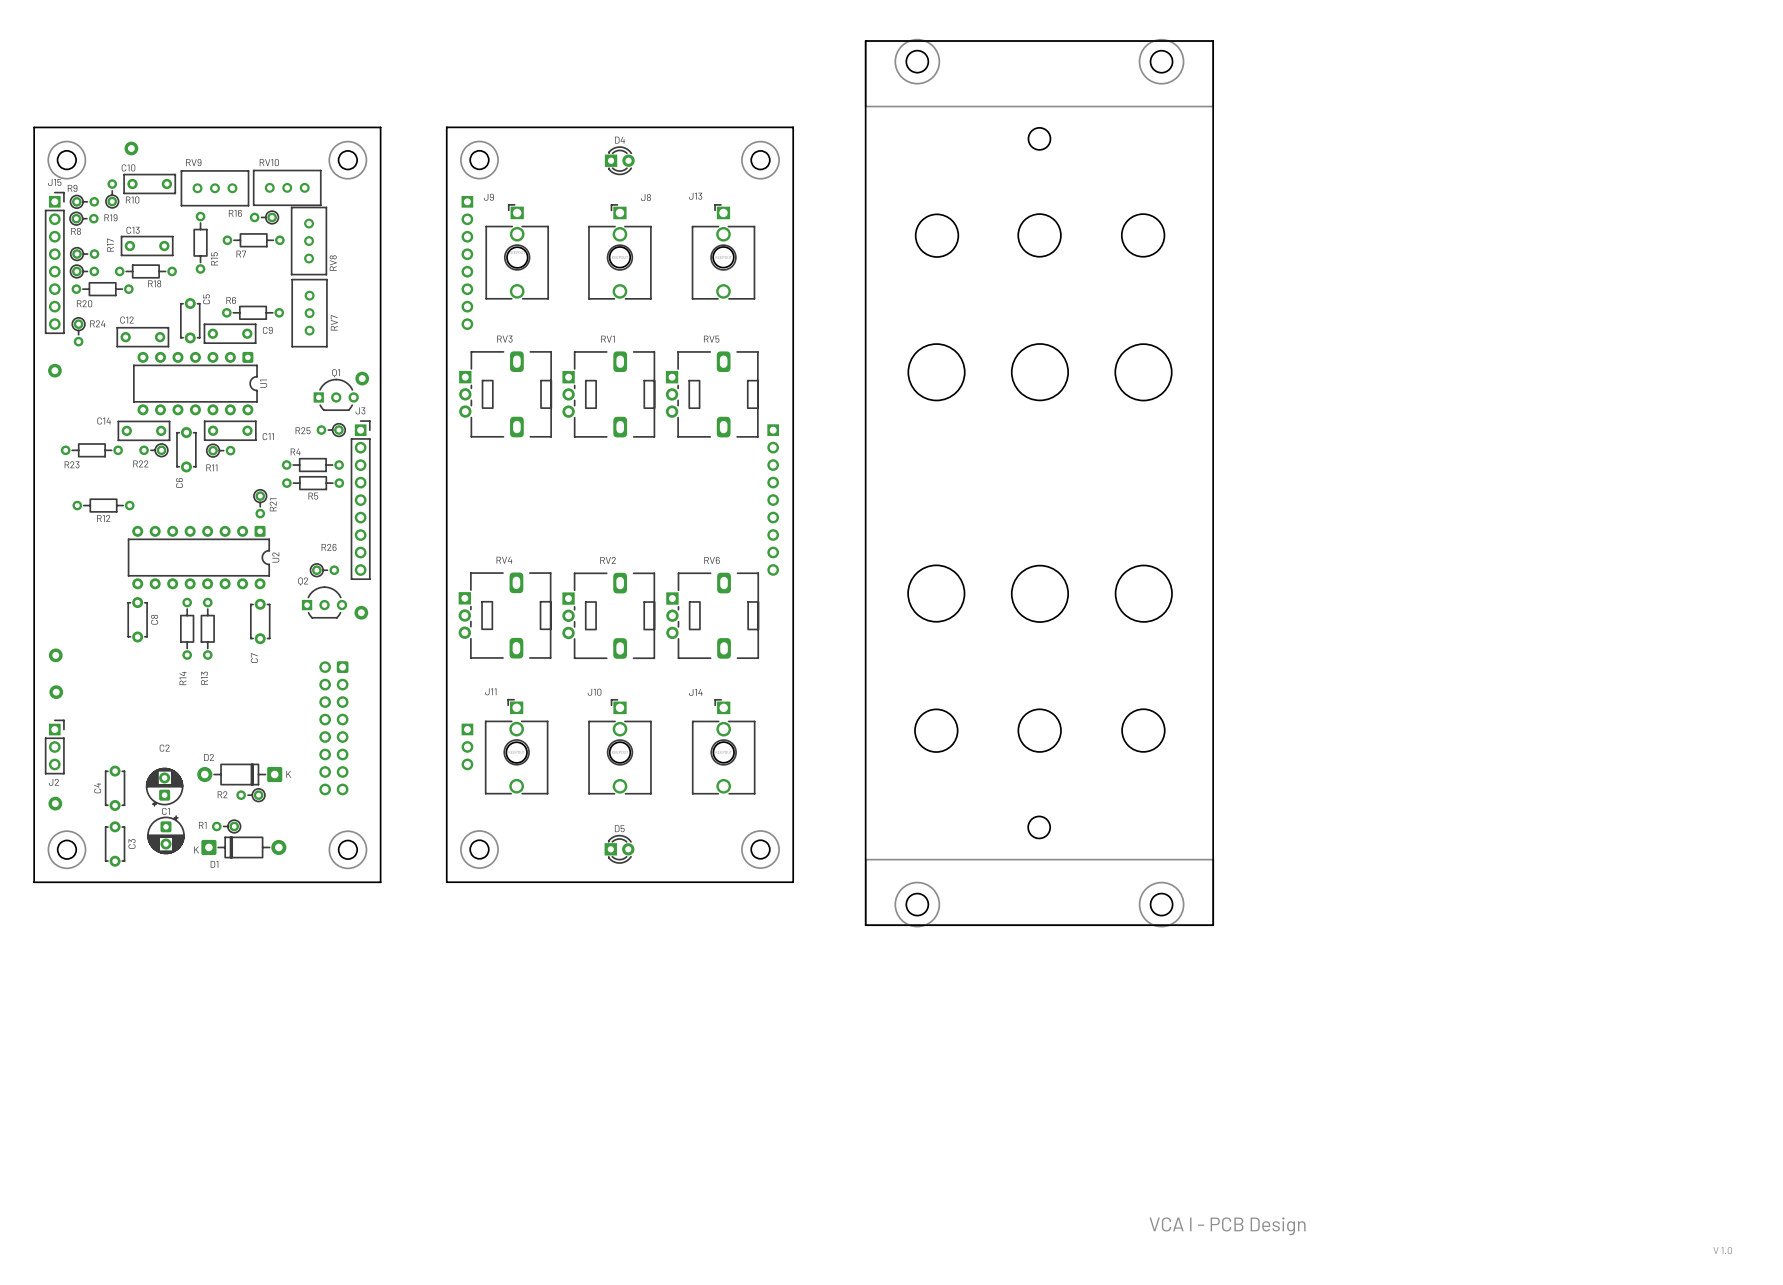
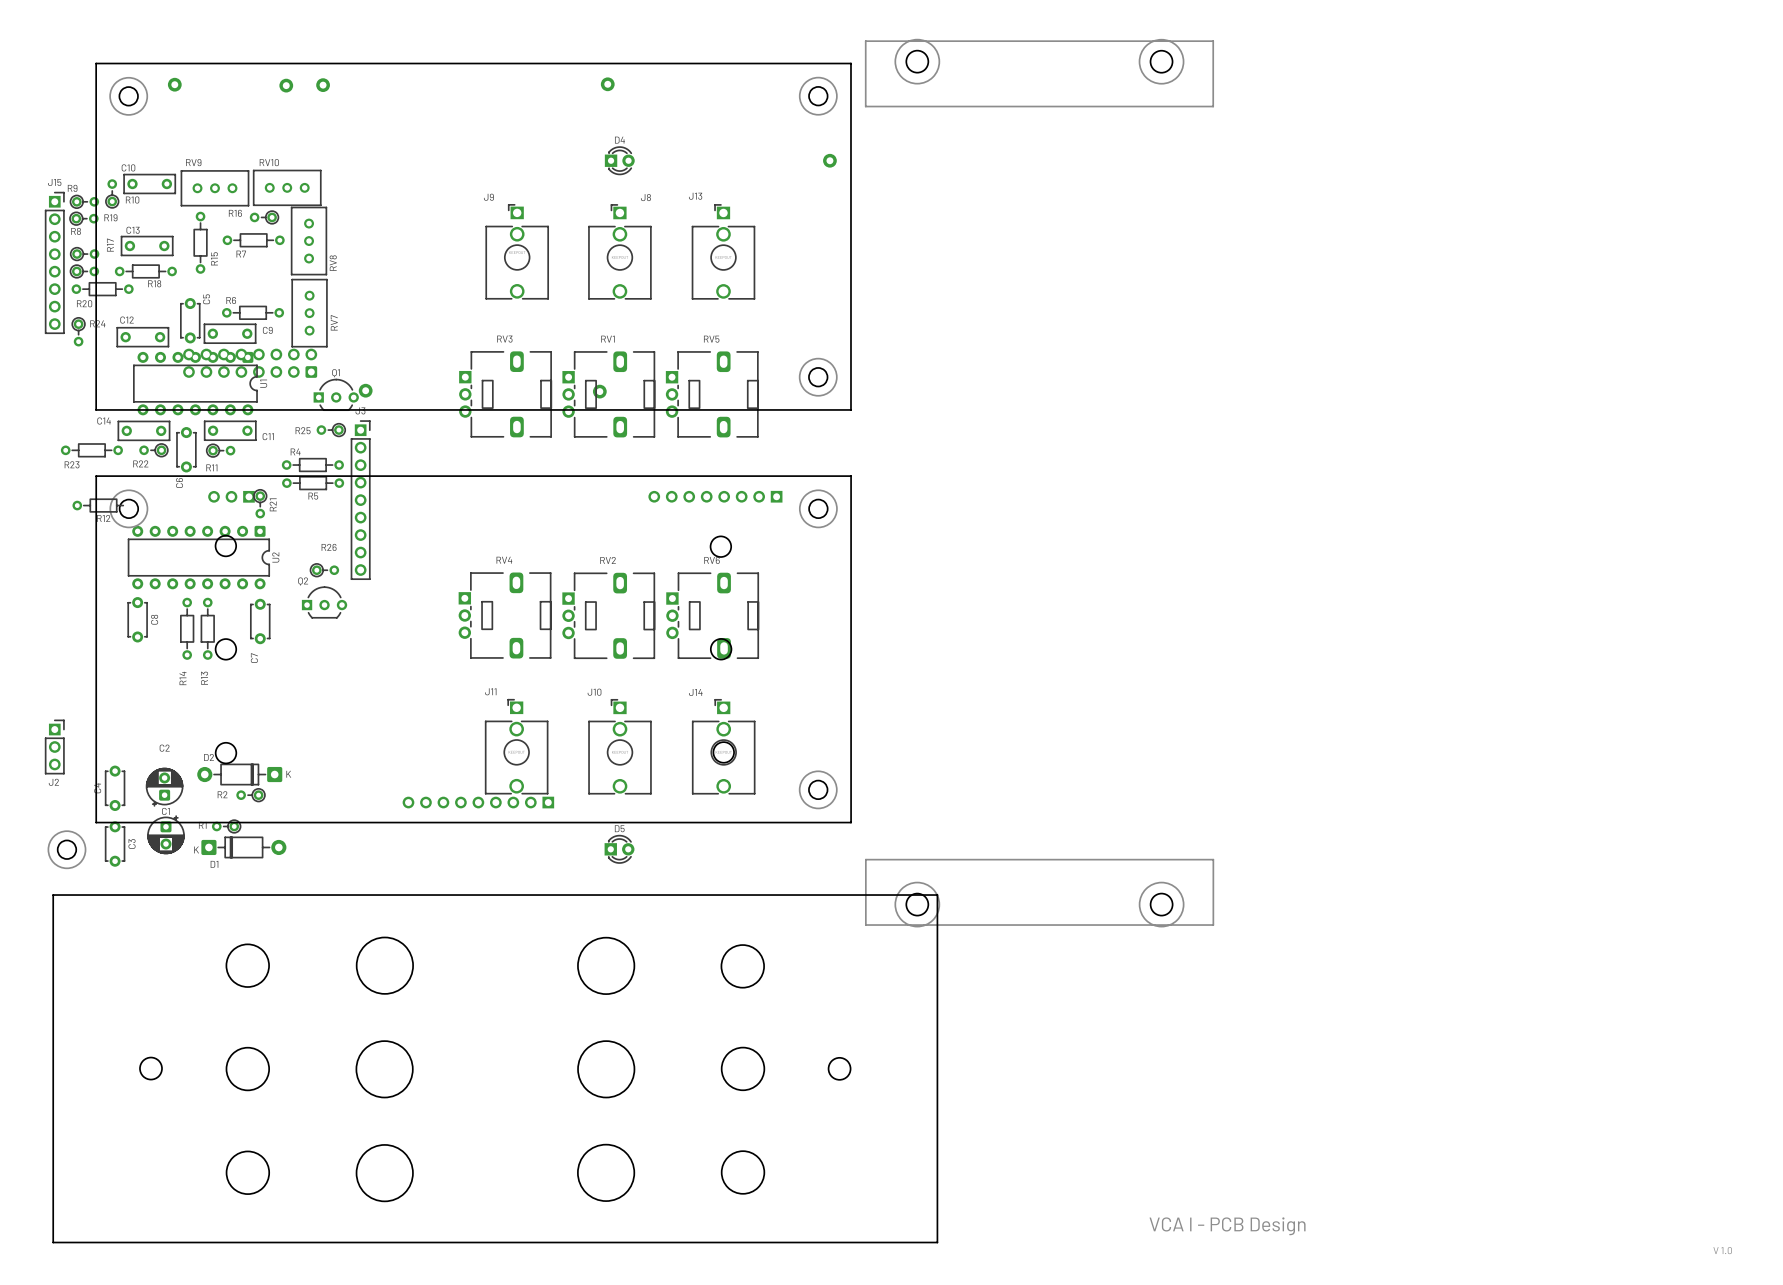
board edge: (865, 41) (1213, 41) (1213, 925) (865, 925) (865, 41) -> none
board edge: none -> (96, 63) (850, 63) (850, 409) (96, 409) (96, 63)
part: none -> (607, 84)
part: none -> (286, 85)
part: none -> (323, 85)
board edge: (34, 127) (380, 127) (380, 882) (34, 882) (34, 127) -> none
board edge: (446, 127) (793, 127) (793, 882) (446, 882) (446, 127) -> none
round board edge: [1028, 127, 1051, 151] -> none
part position: (131, 148) -> (174, 84)
part position: (66, 160) -> (128, 96)
part: (347, 160) -> none
part: (479, 160) -> none
part position: (760, 160) -> (818, 96)
part: none -> (829, 160)
round board edge: [1018, 213, 1062, 257] -> none
round board edge: [1121, 213, 1165, 257] -> none
round board edge: [915, 214, 959, 258] -> none
round board edge: [609, 246, 631, 268] -> none
round board edge: [712, 246, 734, 268] -> none
round board edge: [506, 247, 528, 269] -> none
part: (467, 262) -> none
round board edge: [908, 343, 965, 401] -> none
round board edge: [1011, 343, 1069, 401] -> none
round board edge: [1115, 343, 1172, 401] -> none
part: none -> (250, 363)
part: (54, 370) -> none
part: none -> (818, 377)
part position: (362, 378) -> (365, 390)
part: none -> (599, 391)
board edge: none -> (96, 476) (851, 476) (851, 822) (96, 822) (96, 476)
part: none -> (231, 496)
part: none -> (715, 496)
part: (773, 500) -> none
part: none -> (128, 508)
part: none -> (818, 508)
round board edge: none -> [215, 535, 237, 557]
round board edge: none -> [710, 536, 732, 558]
round board edge: [907, 565, 965, 622] -> none
round board edge: [1011, 565, 1069, 623] -> none
round board edge: [1115, 565, 1173, 623] -> none
part: (361, 612) -> none
round board edge: none -> [215, 638, 237, 660]
round board edge: none -> [710, 638, 732, 660]
part: (55, 655) -> none
part: (56, 692) -> none
round board edge: [914, 709, 958, 753] -> none
round board edge: [1018, 709, 1062, 753] -> none
round board edge: [1121, 709, 1165, 753] -> none
part: (333, 728) -> none
round board edge: none -> [215, 742, 237, 764]
round board edge: [506, 742, 528, 764] -> none
round board edge: [609, 742, 631, 764] -> none
part: (467, 746) -> none
part: none -> (478, 802)
part: (55, 803) -> none
round board edge: [1028, 816, 1051, 839] -> none
part: (347, 849) -> none
part: (479, 849) -> none
part position: (760, 849) -> (818, 789)
board edge: none -> (53, 895) (937, 895) (937, 1242) (53, 1242) (53, 895)
round board edge: none -> [356, 937, 414, 995]
round board edge: none -> [577, 937, 635, 995]
round board edge: none -> [226, 944, 270, 988]
round board edge: none -> [721, 944, 765, 988]
round board edge: none -> [356, 1040, 413, 1098]
round board edge: none -> [577, 1040, 635, 1098]
round board edge: none -> [226, 1047, 270, 1091]
round board edge: none -> [721, 1047, 765, 1091]
round board edge: none -> [139, 1057, 163, 1080]
round board edge: none -> [828, 1057, 851, 1081]
round board edge: none -> [356, 1144, 414, 1202]
round board edge: none -> [577, 1144, 635, 1202]
round board edge: none -> [721, 1150, 765, 1194]
round board edge: none -> [226, 1151, 270, 1195]

